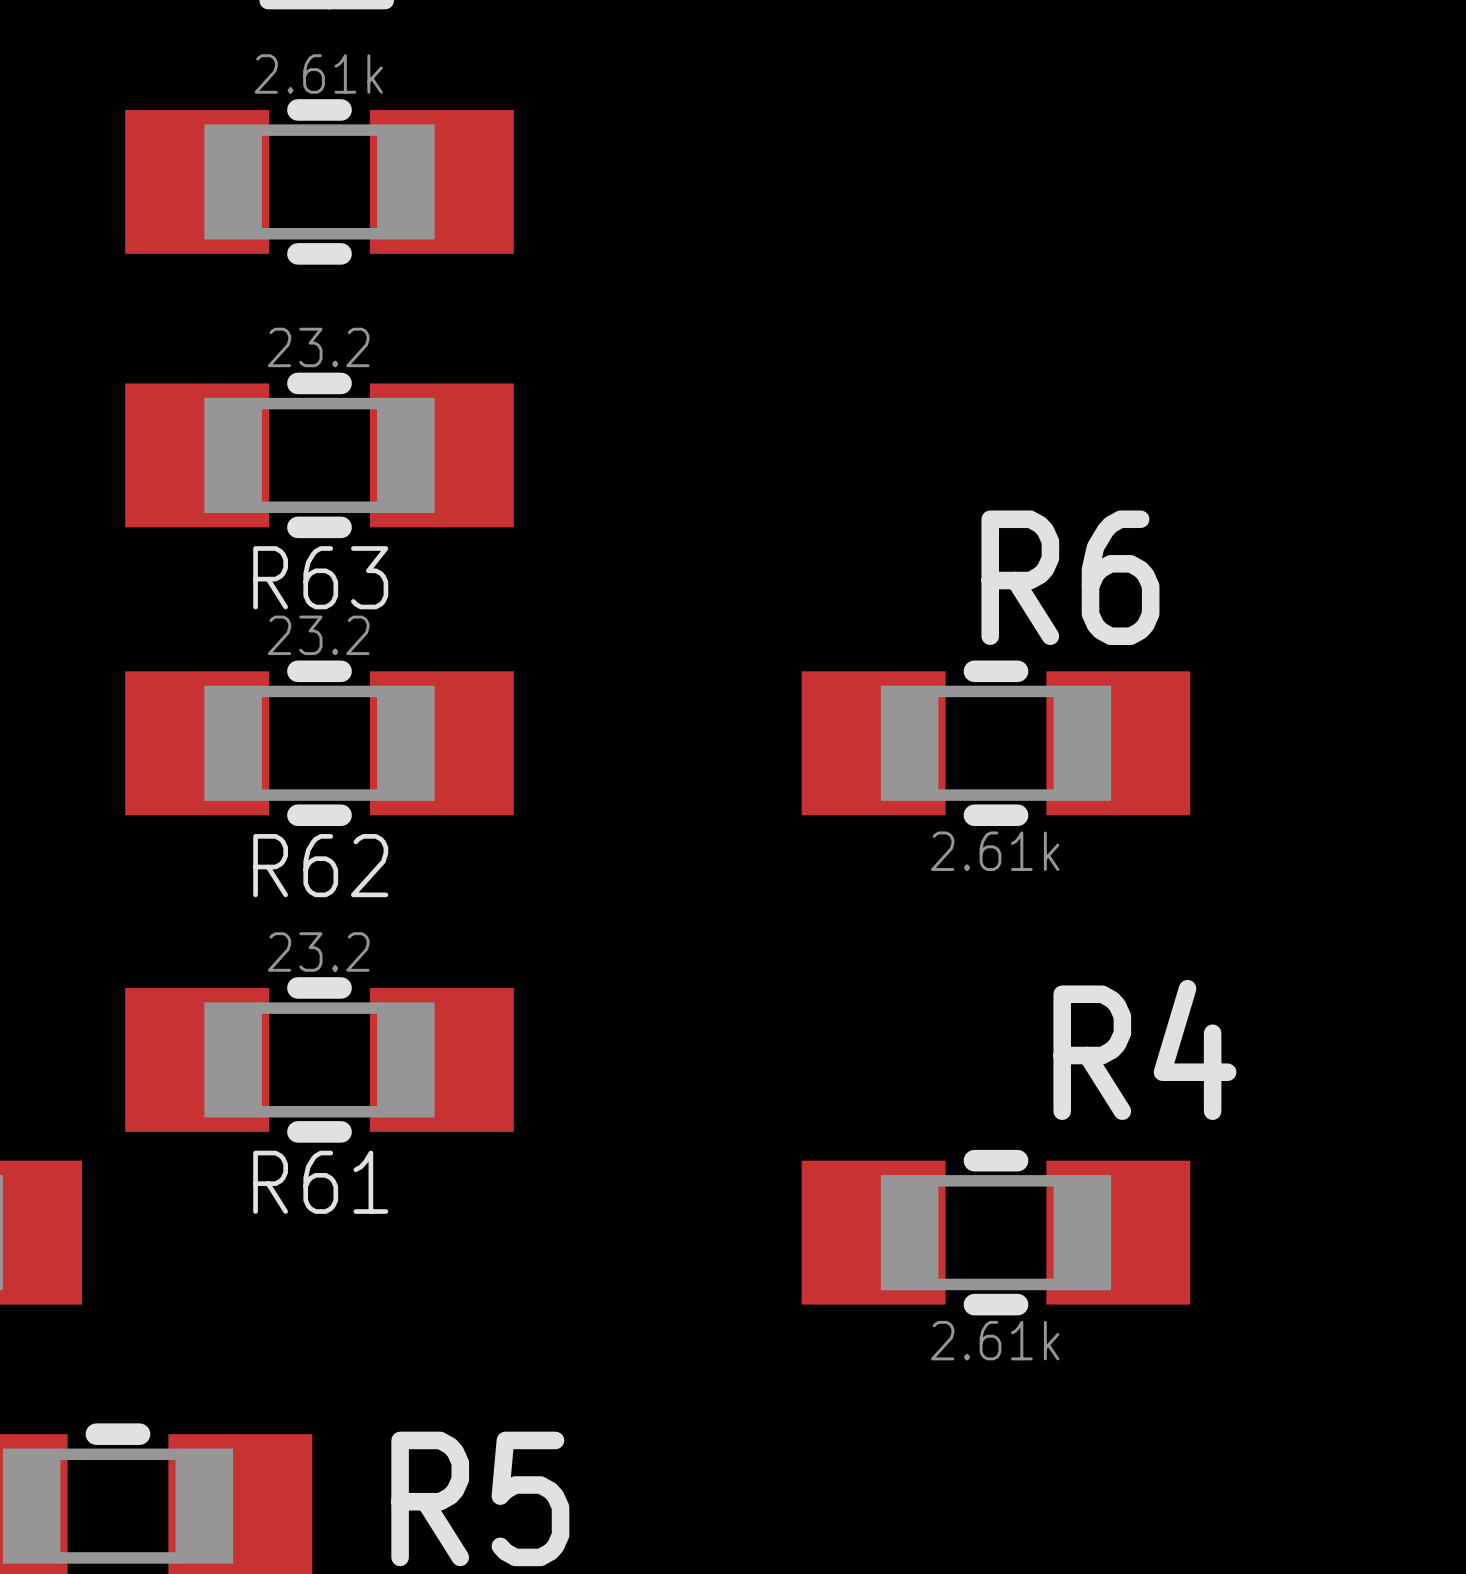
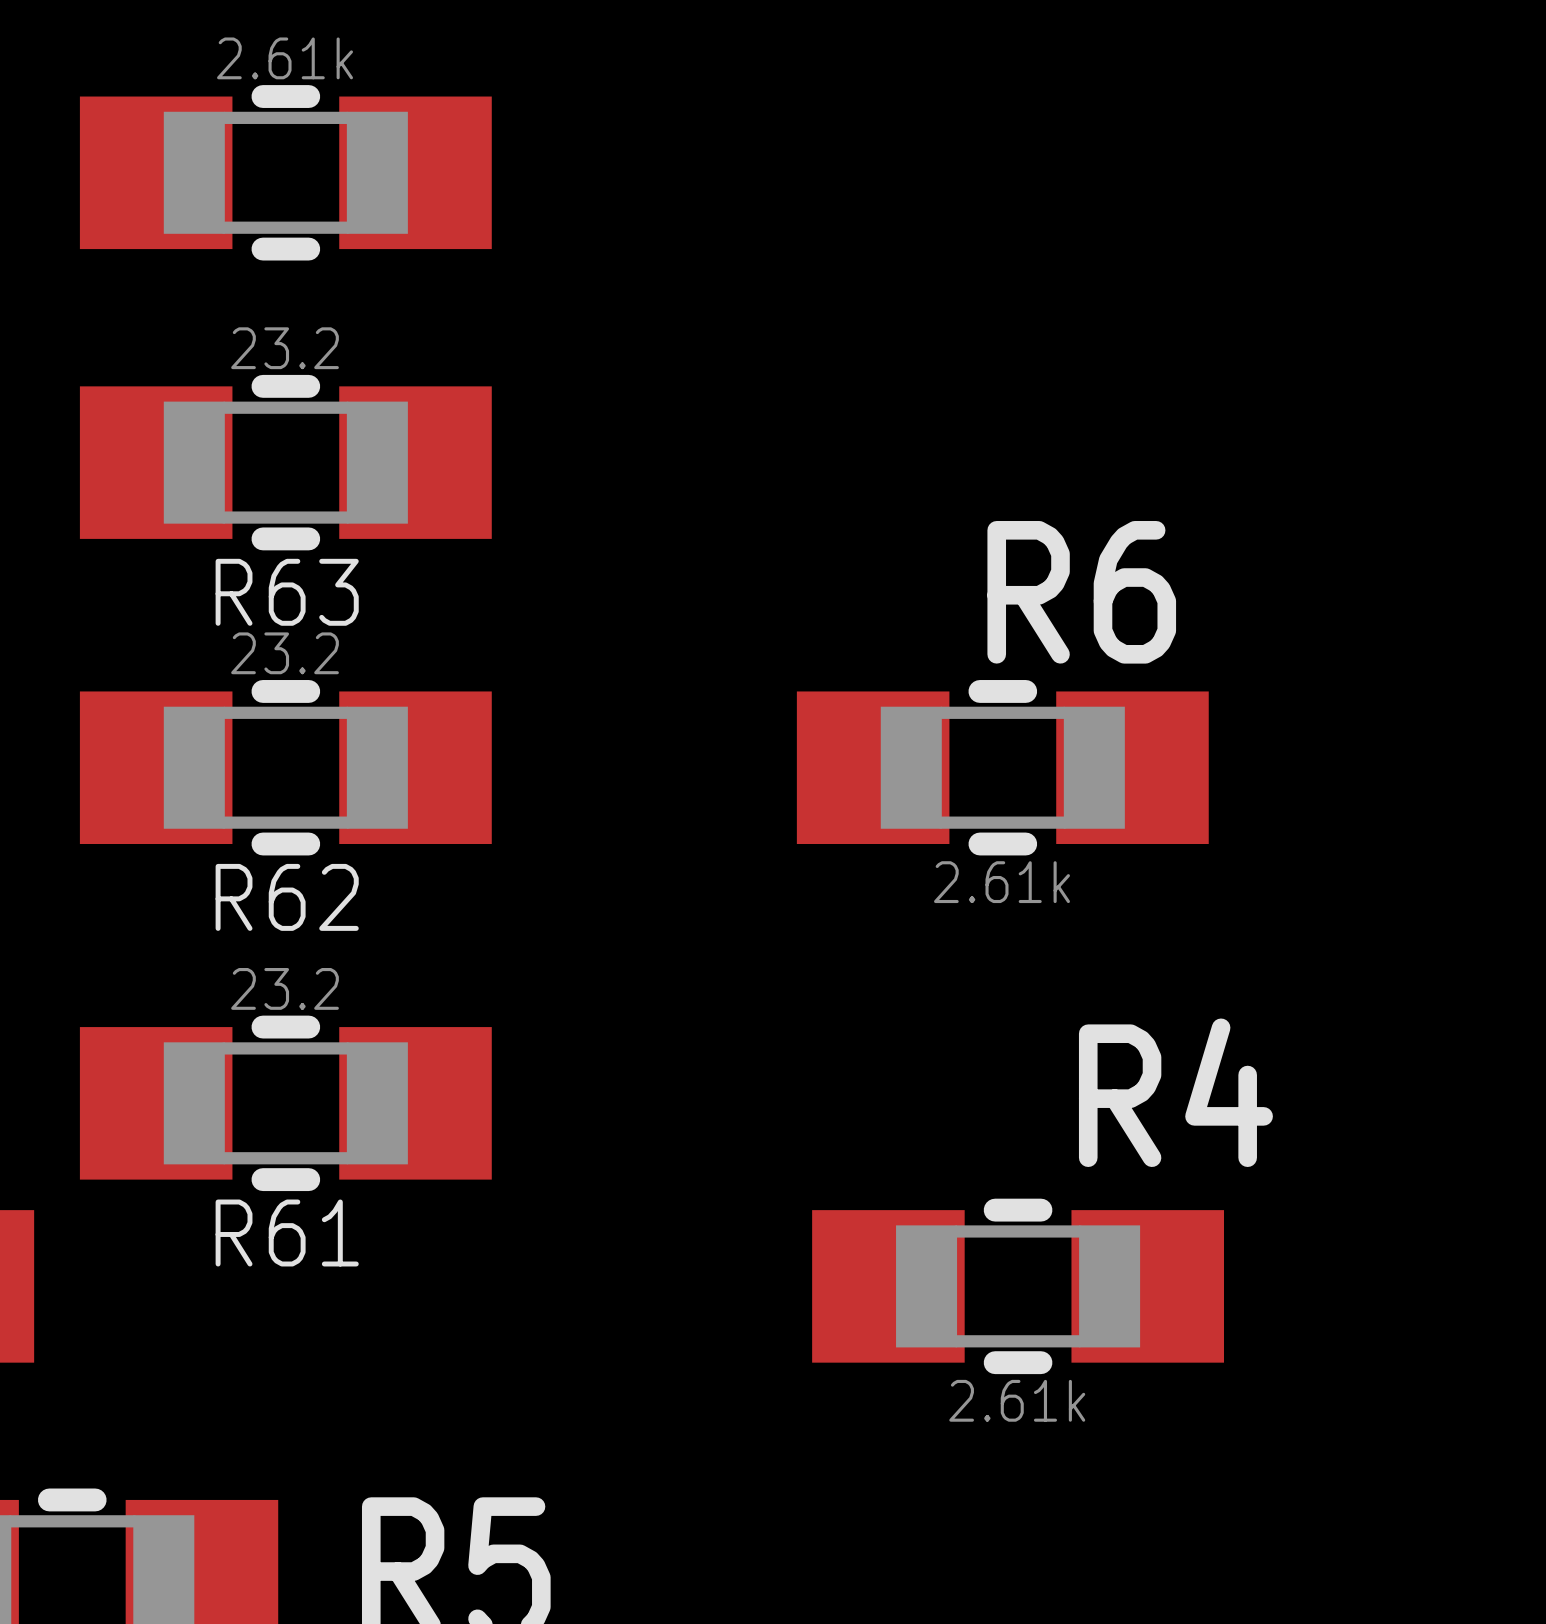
R4 position: (995, 1232) -> (1018, 1286)

